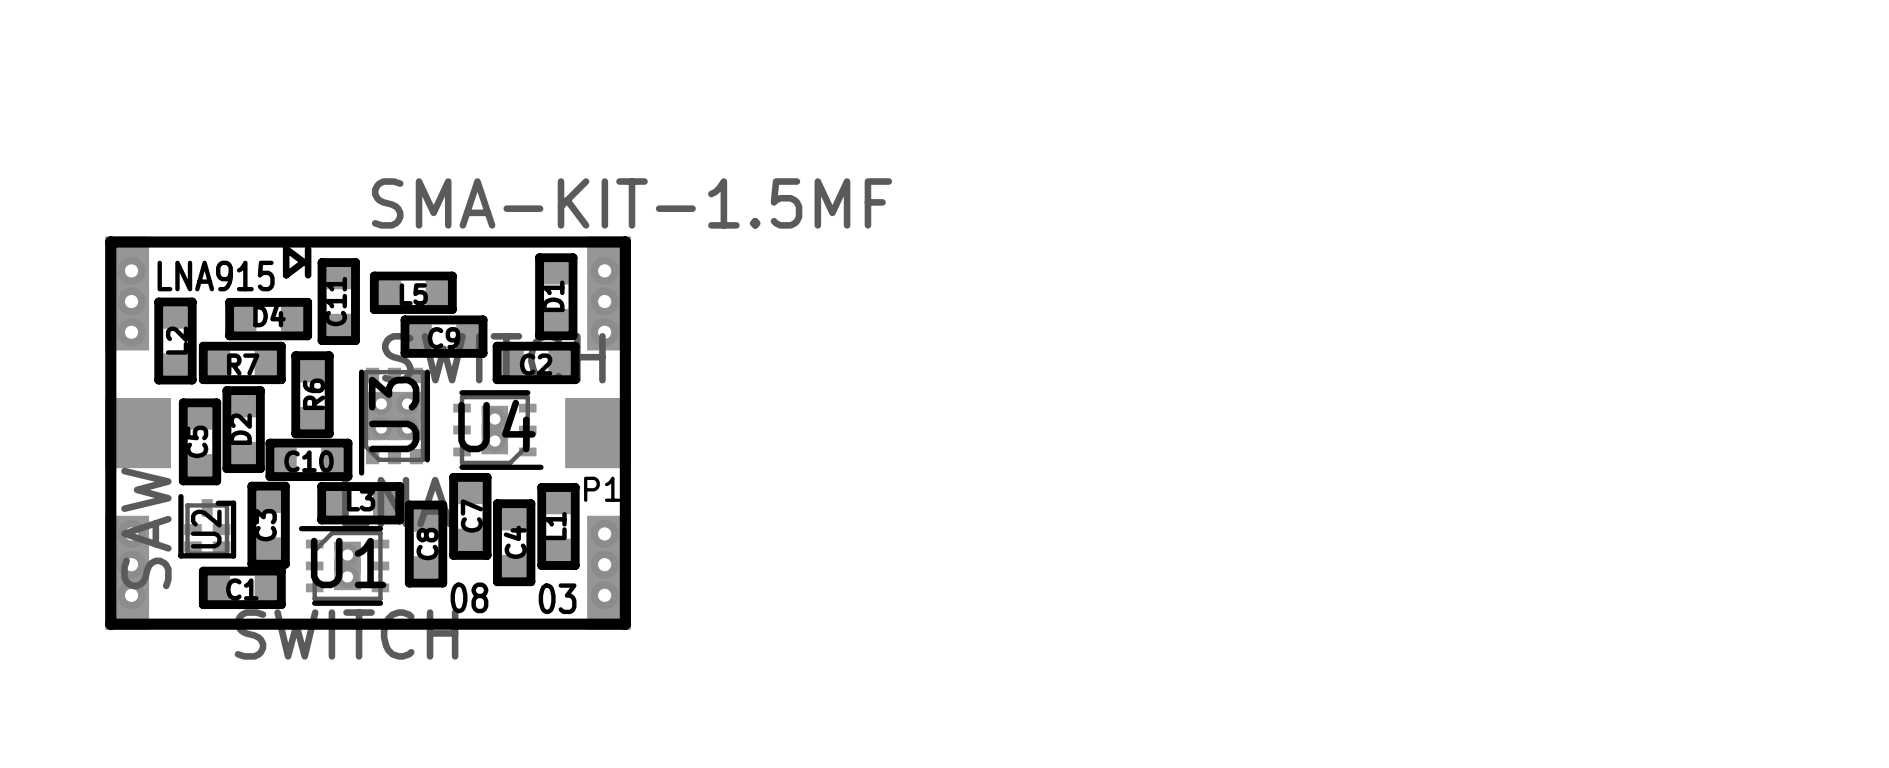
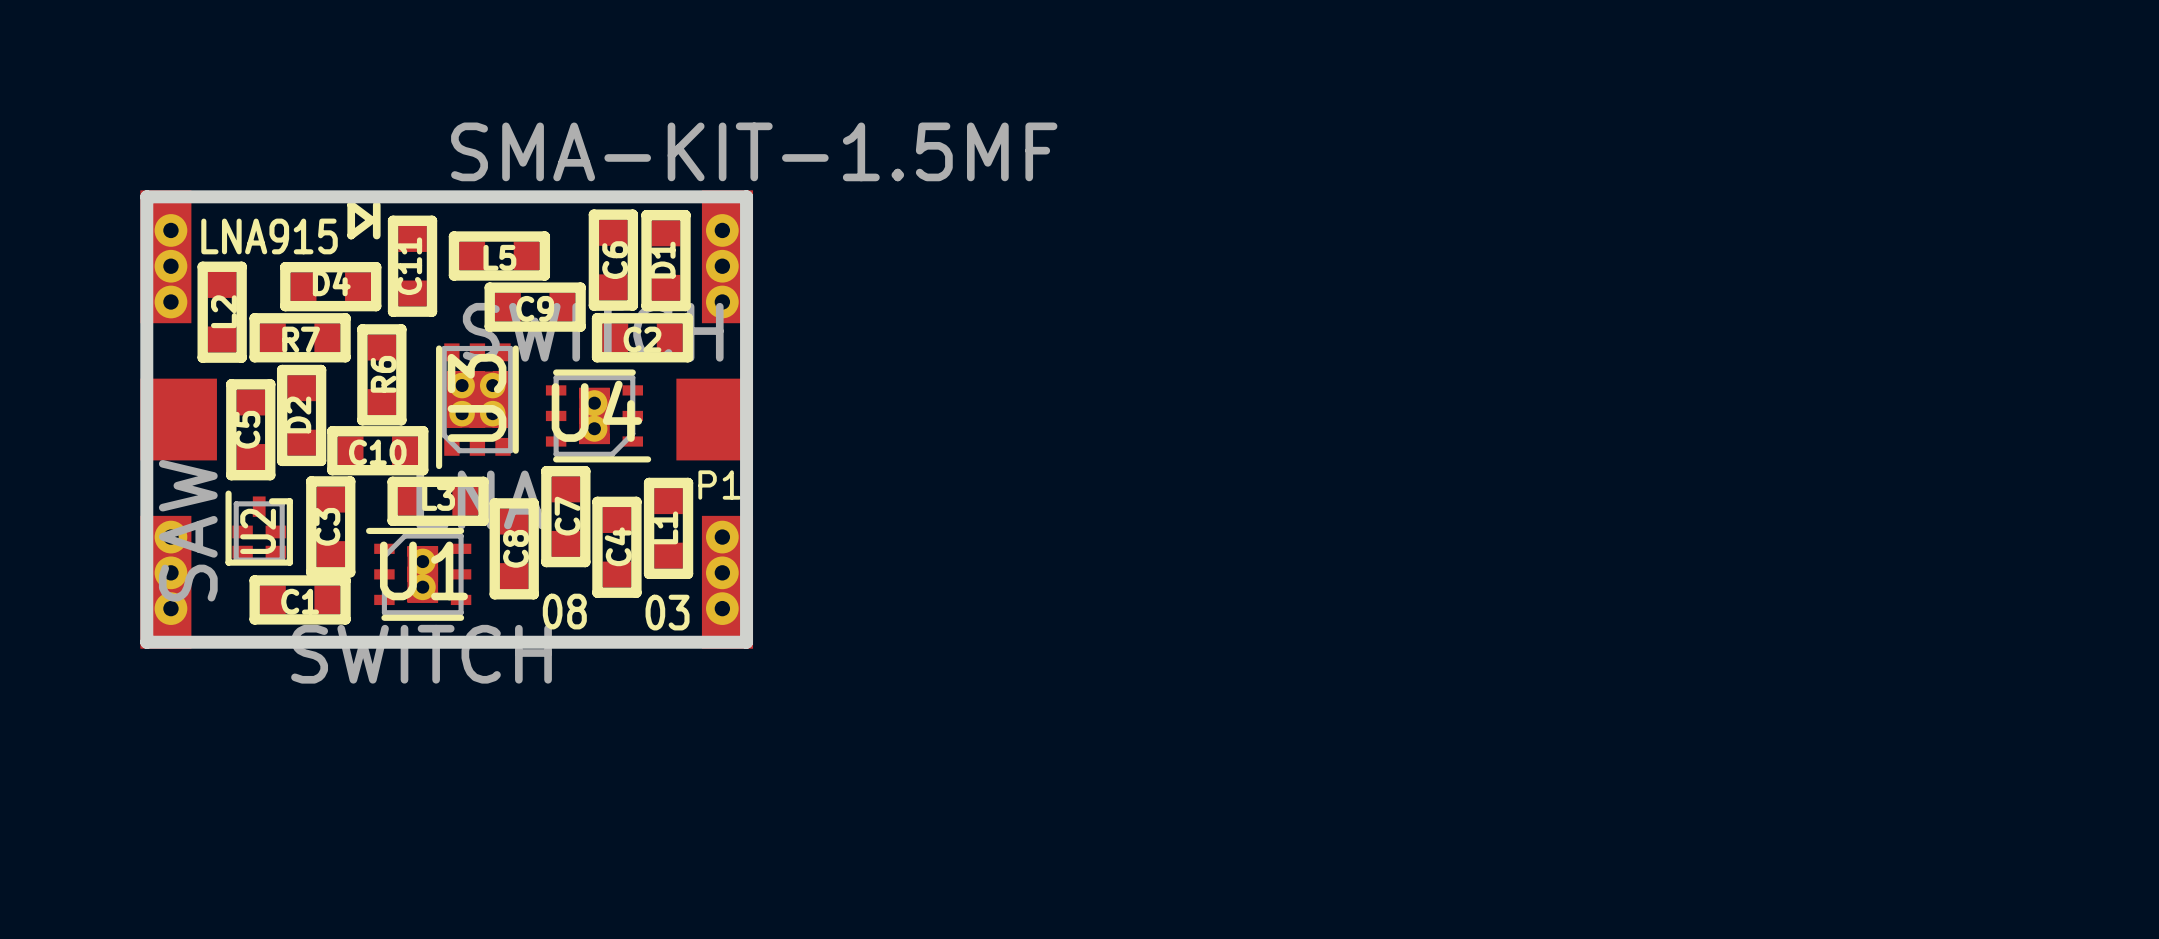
C6: none -> (613, 260)

